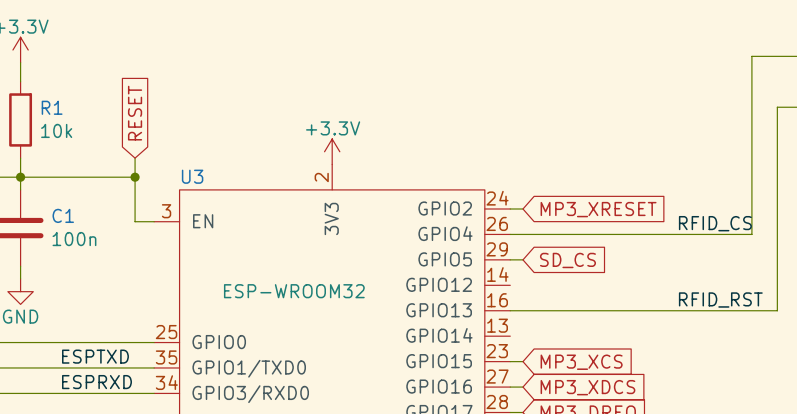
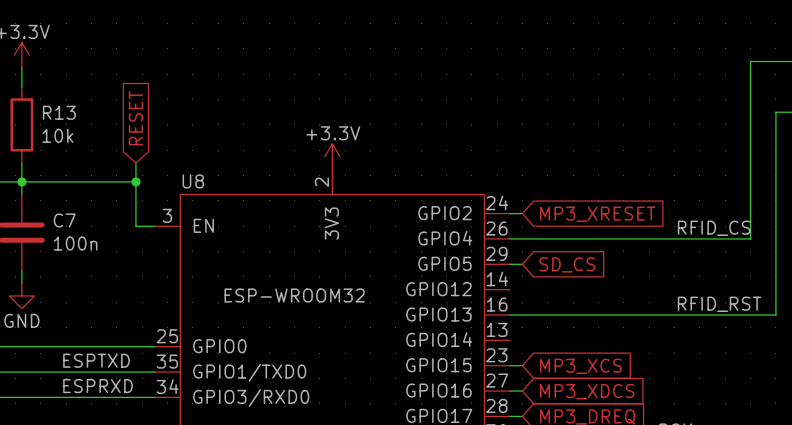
R1 name: R1 (52, 107) -> R13 (59, 112)
U3 name: U3 (192, 176) -> U8 (193, 181)
C1 name: C1 (63, 215) -> C7 (64, 220)

